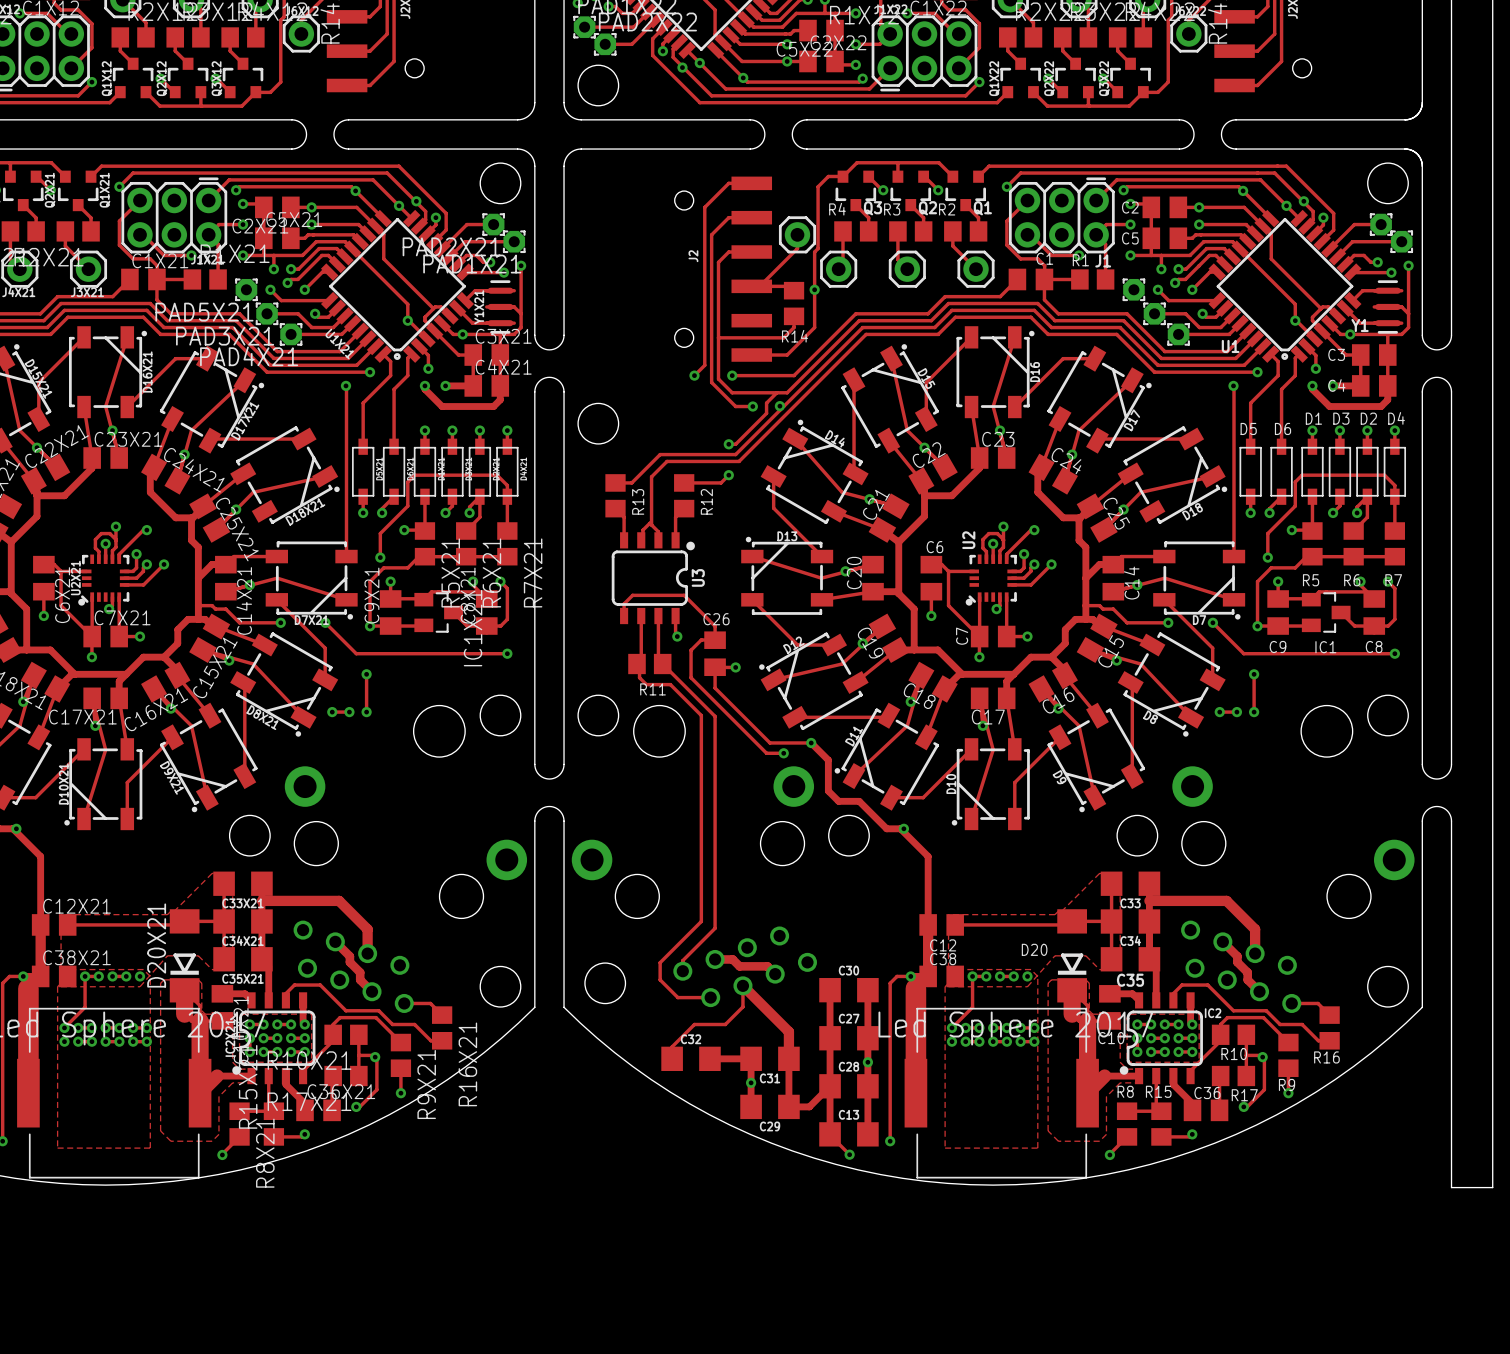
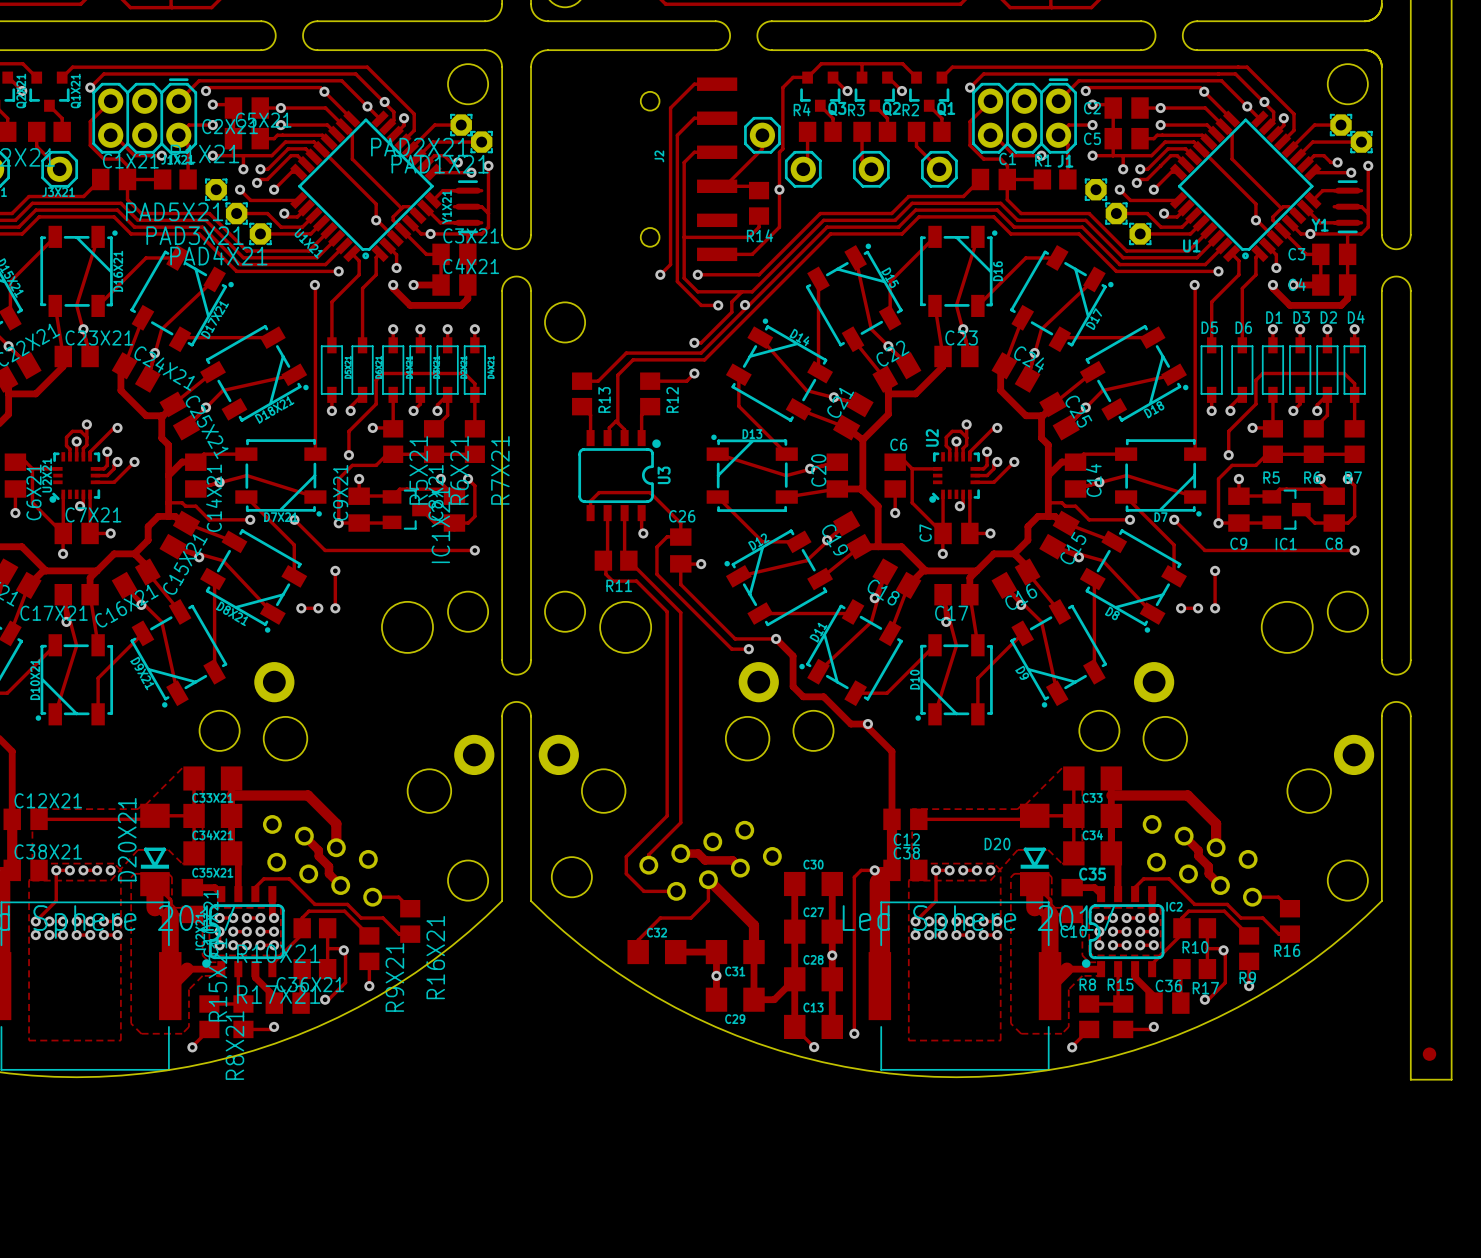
part: none -> (1429, 1054)

